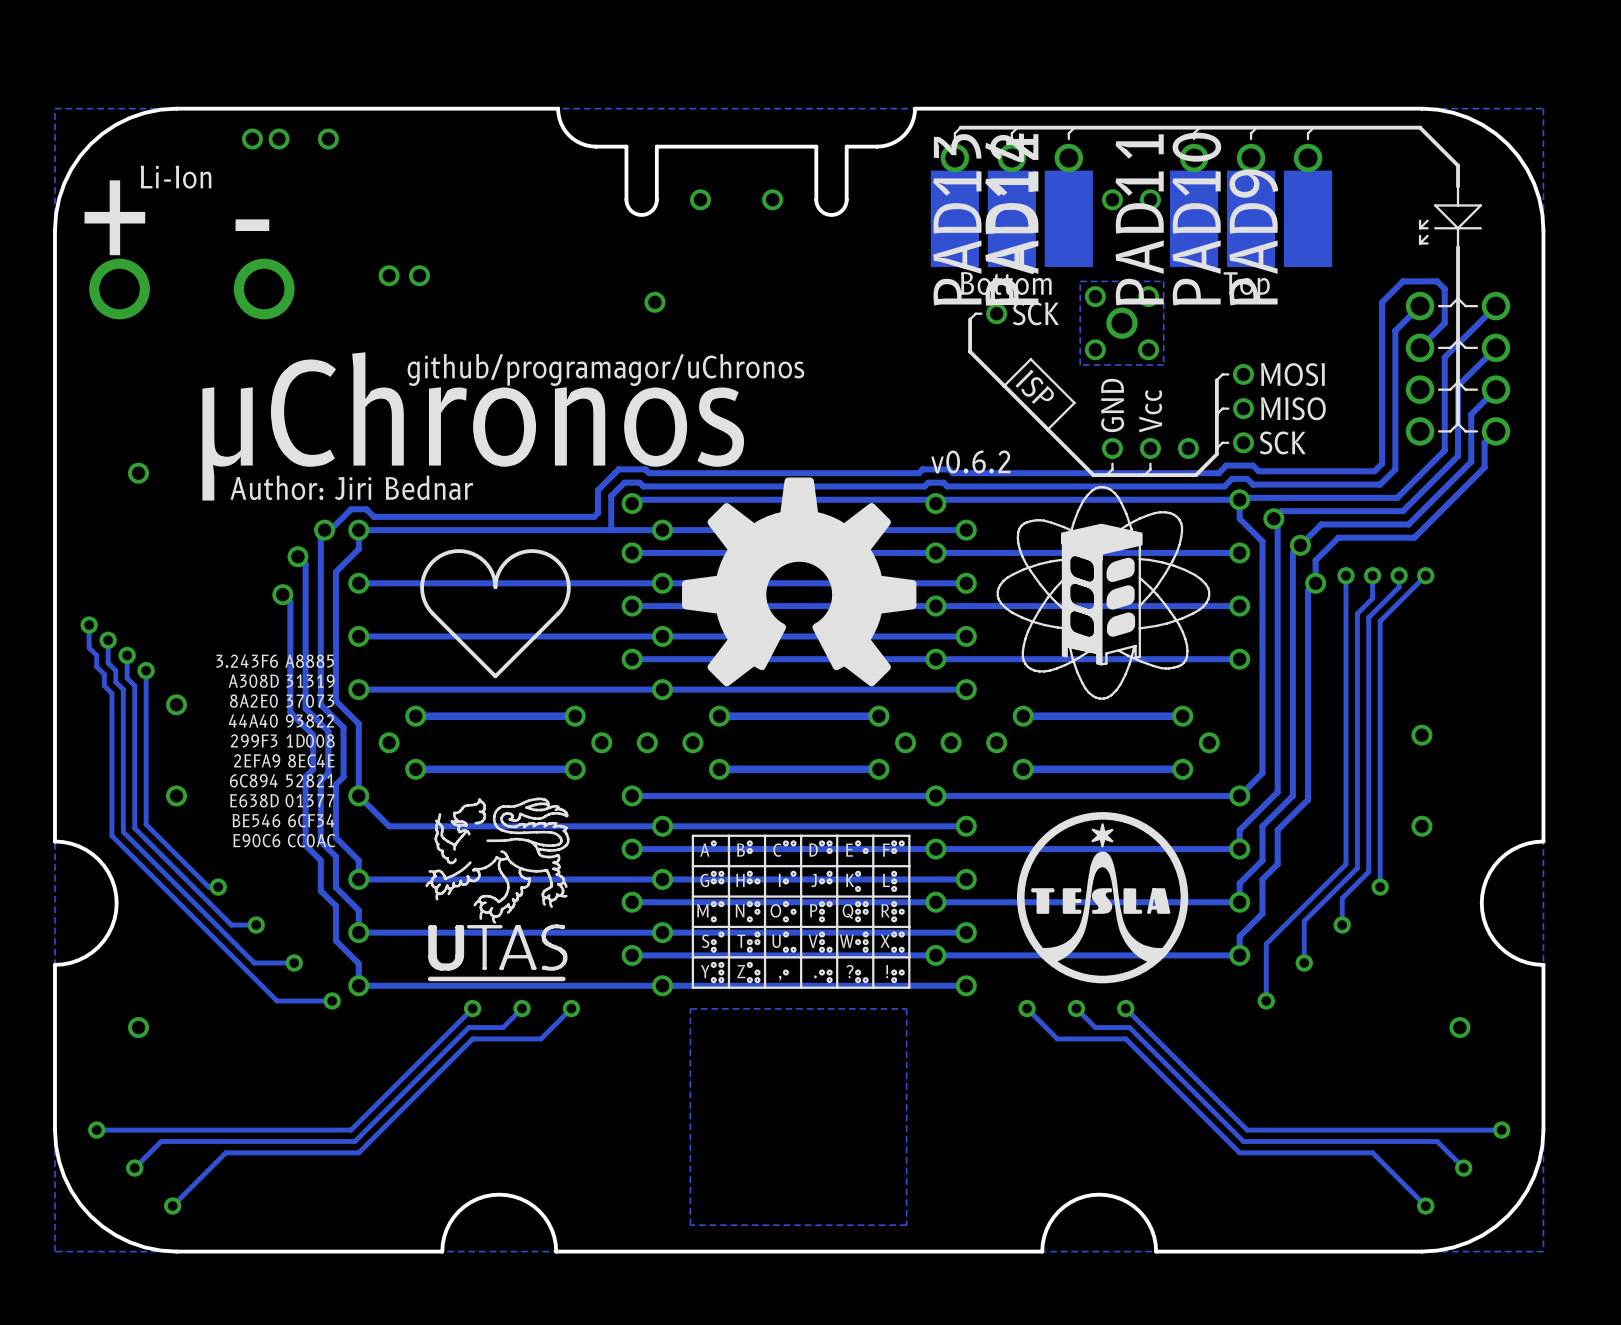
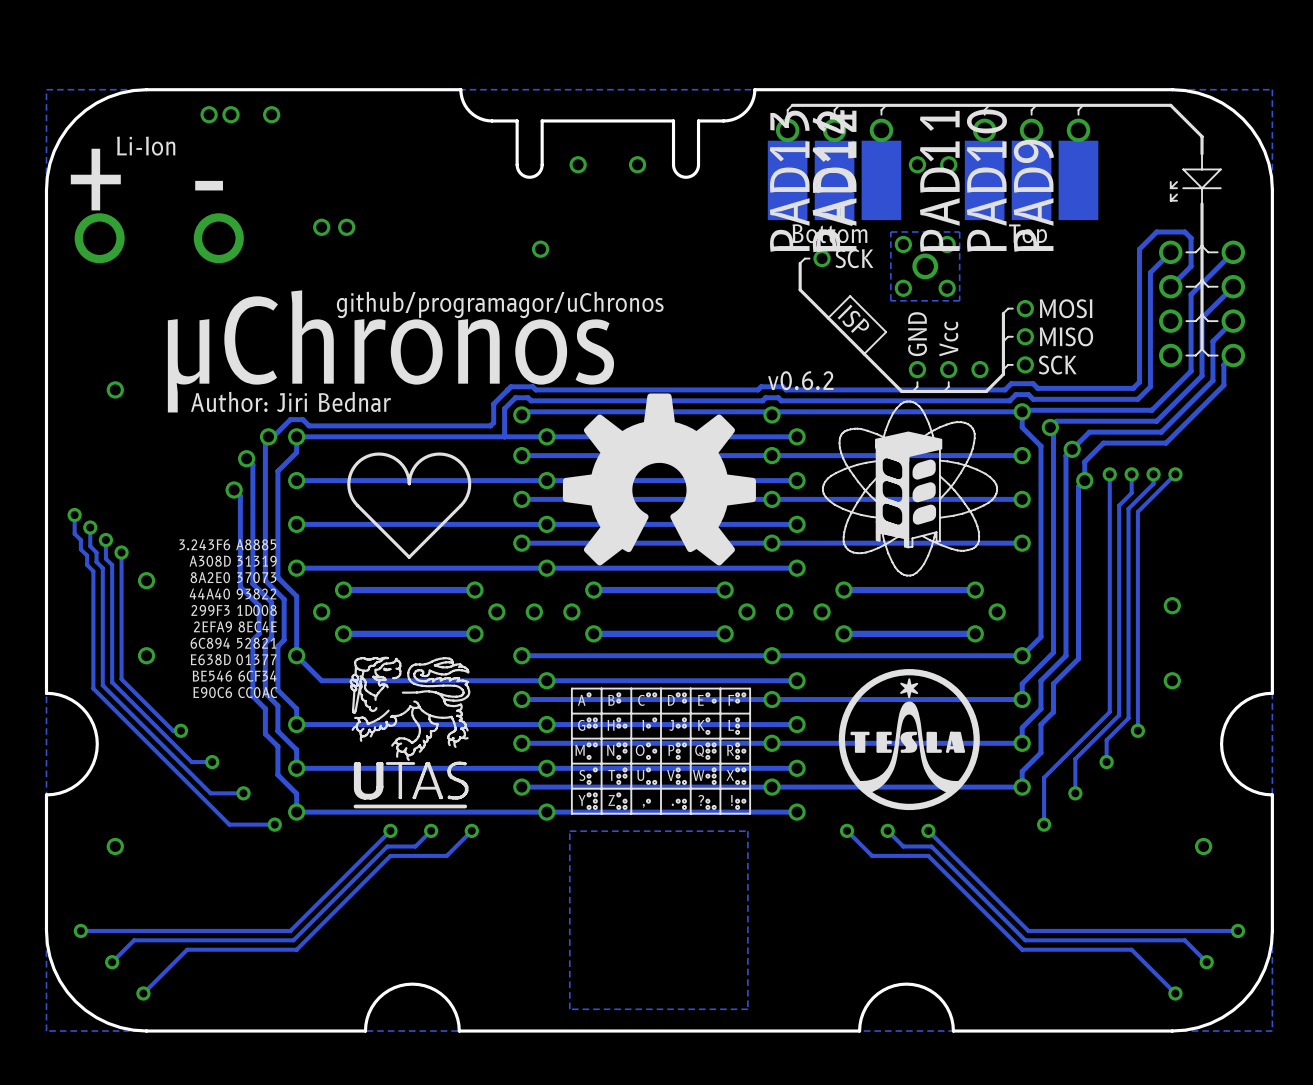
line: none -> (387, 658) (384, 657) (379, 659) (375, 658) (369, 659) (361, 658) (356, 660) (355, 664) (358, 669) (366, 670) (370, 666) (387, 658)
line: none -> (355, 667) (355, 674)
line: none -> (384, 670) (390, 669) (384, 669)
line: none -> (356, 675) (352, 677) (356, 680) (358, 678) (356, 675)
line: none -> (360, 683) (354, 712) (354, 691)
line: none -> (351, 685) (351, 688) (354, 690) (354, 685)
line: none -> (354, 685) (357, 683) (351, 680) (351, 682) (354, 685)

